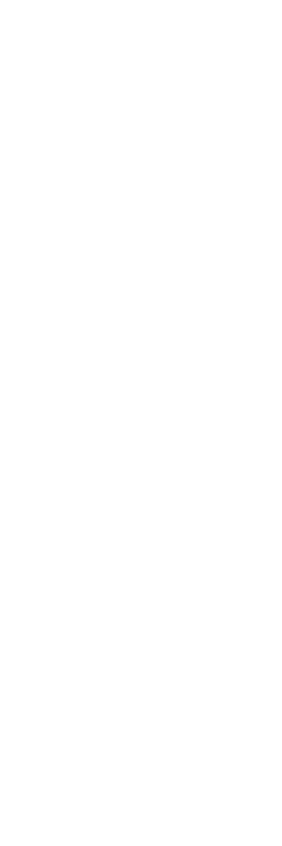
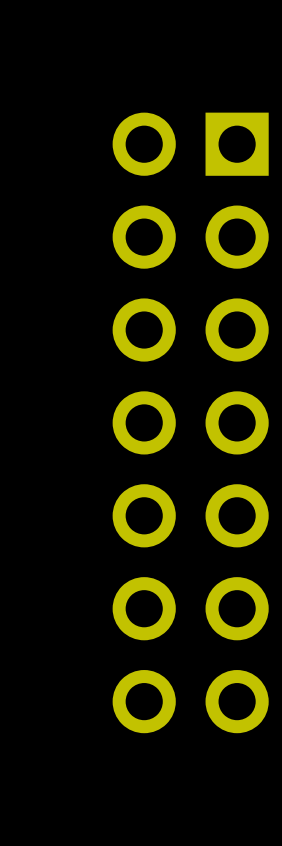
part: none -> (190, 422)

